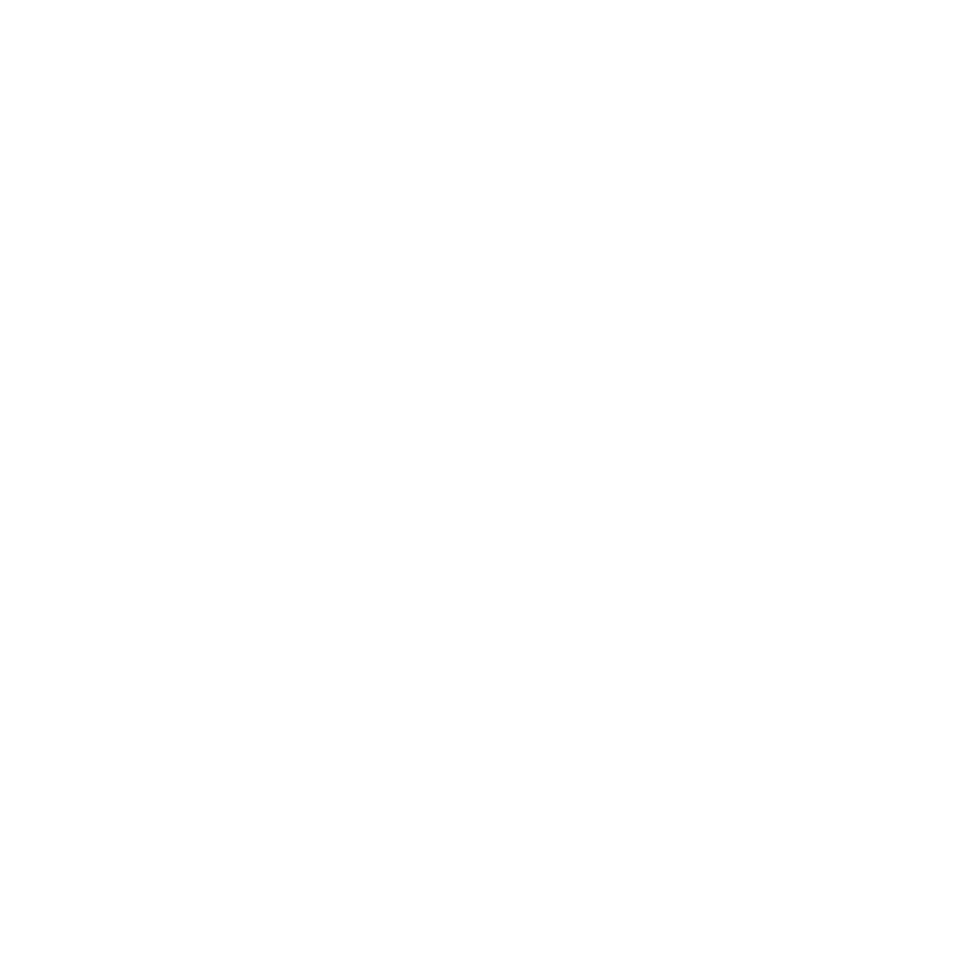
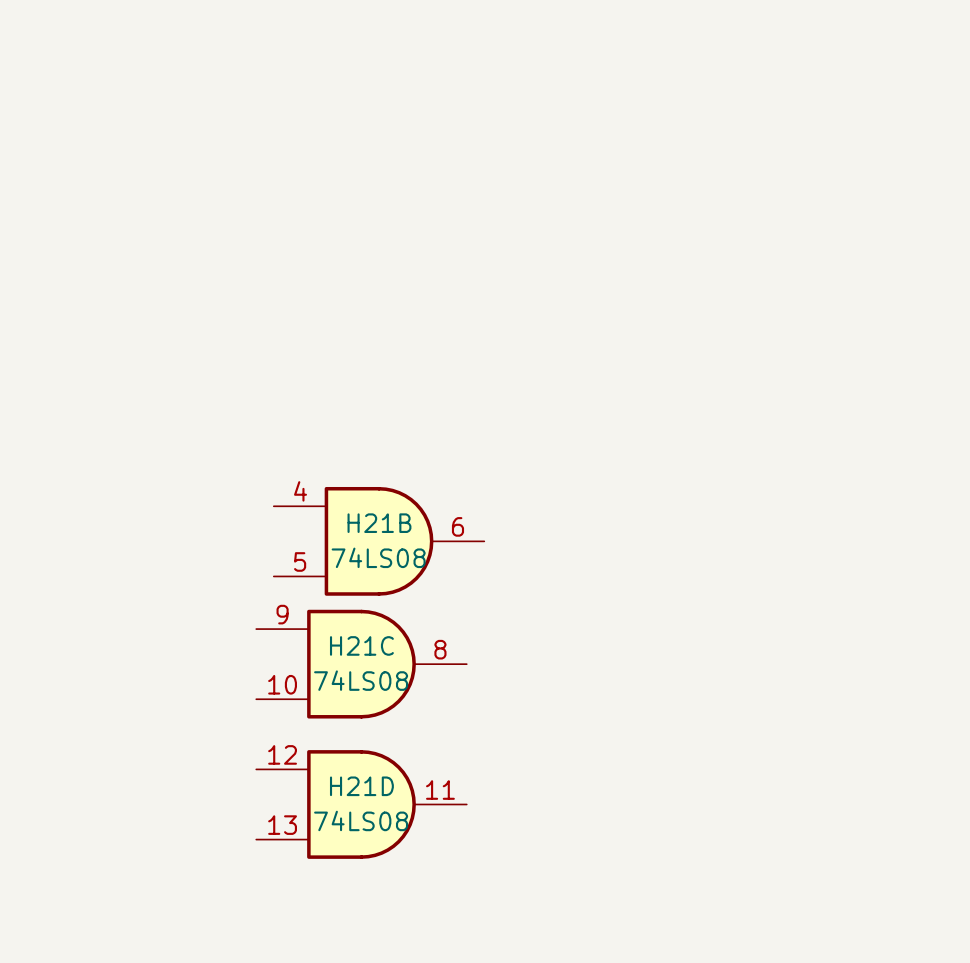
H21B: none -> 74LS08 (379, 541)
H21C: none -> 74LS08 (361, 664)
H21D: none -> 74LS08 (361, 804)

